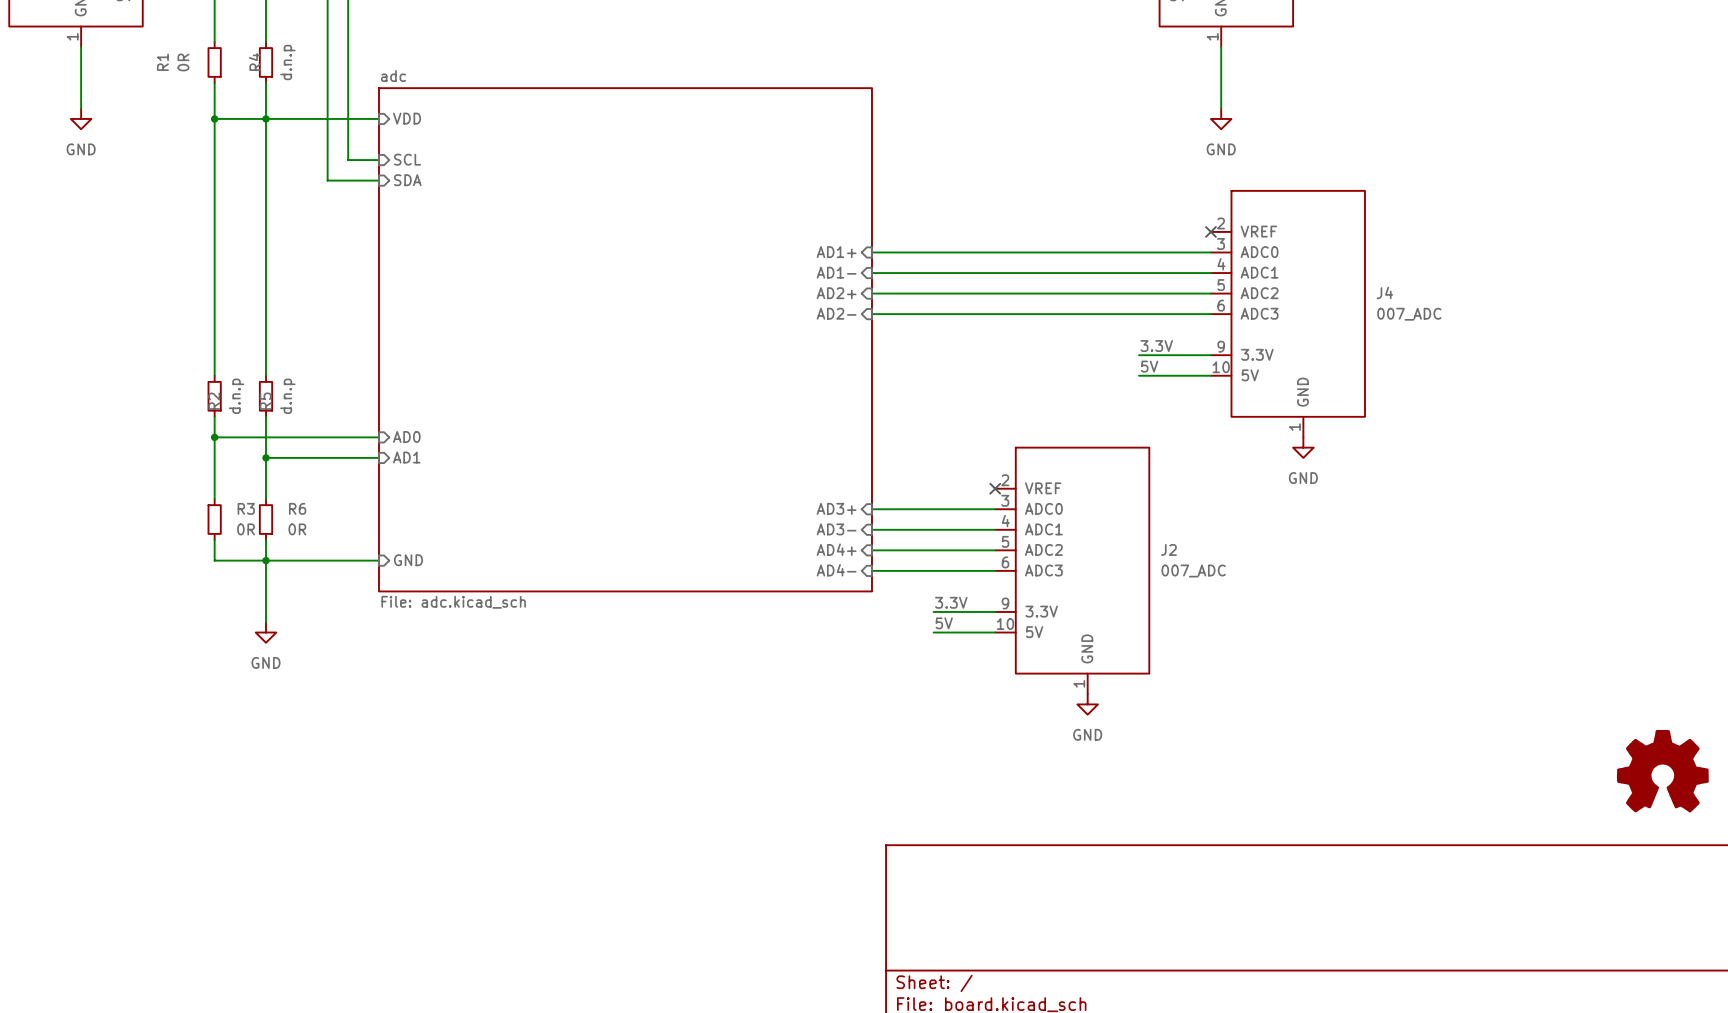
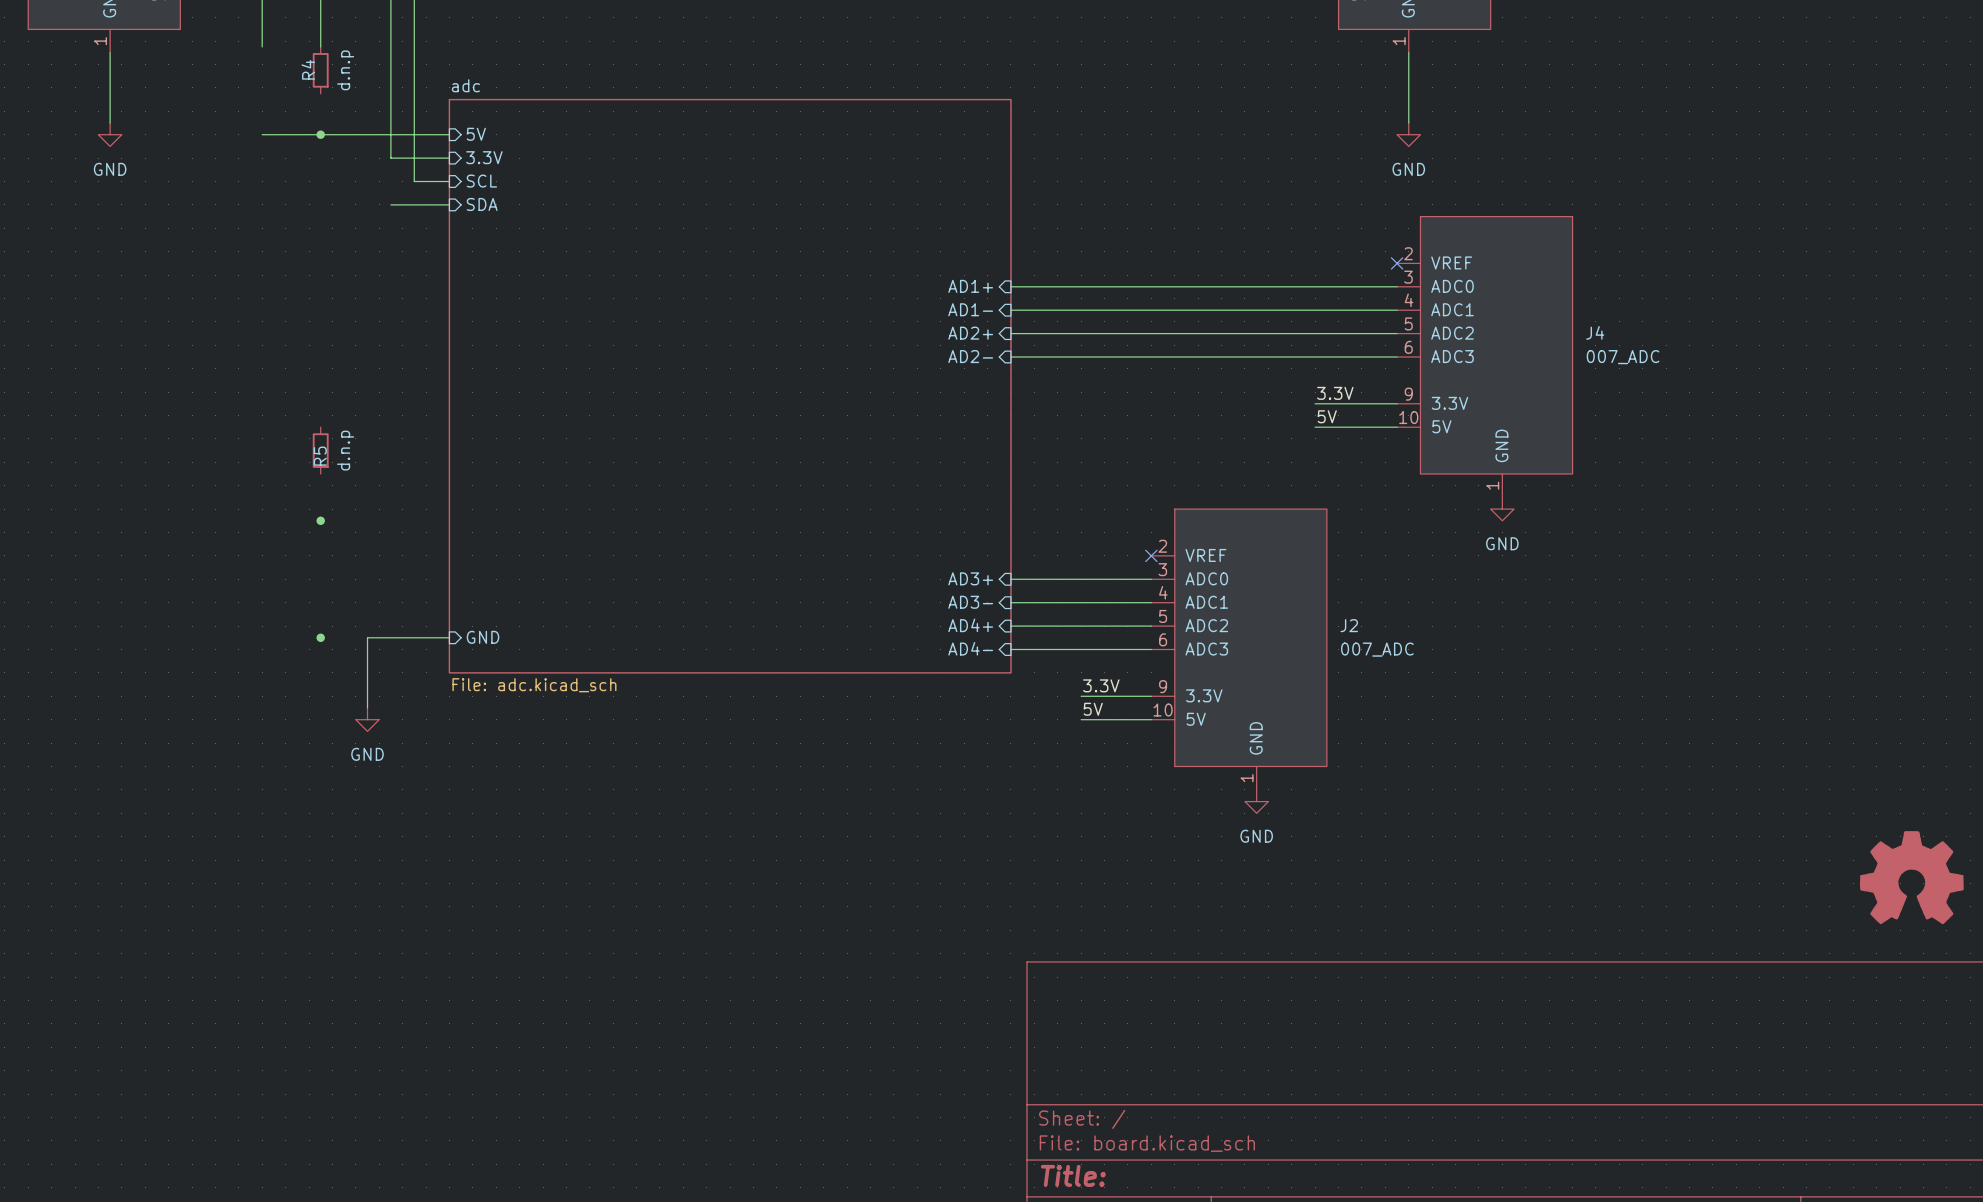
R1: 0R (214, 62) -> none
wire: (214, 83) (214, 375) -> none
wire: (266, 83) (266, 375) -> none
junction: (214, 118) -> none
sheet pin: VDD (407, 118) -> 5V (476, 134)
wire: (327, 139) (327, 180) -> (390, 158) (449, 158)
sheet pin: none -> 3.3V (484, 157)
R2: d.n.p (214, 396) -> none
wire: (214, 416) (214, 498) -> none
wire: (266, 416) (266, 498) -> none
sheet pin: AD0 (406, 436) -> none
wire: (214, 437) (378, 437) -> none
junction: (214, 437) -> none
wire: (266, 457) (378, 457) -> none
sheet pin: AD1 (406, 457) -> none
R3: 0R (214, 519) -> none
R6: 0R (266, 519) -> none
wire: (214, 540) (214, 560) (307, 560) -> (367, 707) (367, 637)
wire: (266, 540) (266, 622) -> none
power symbol position: GND (266, 632) -> GND (367, 719)

